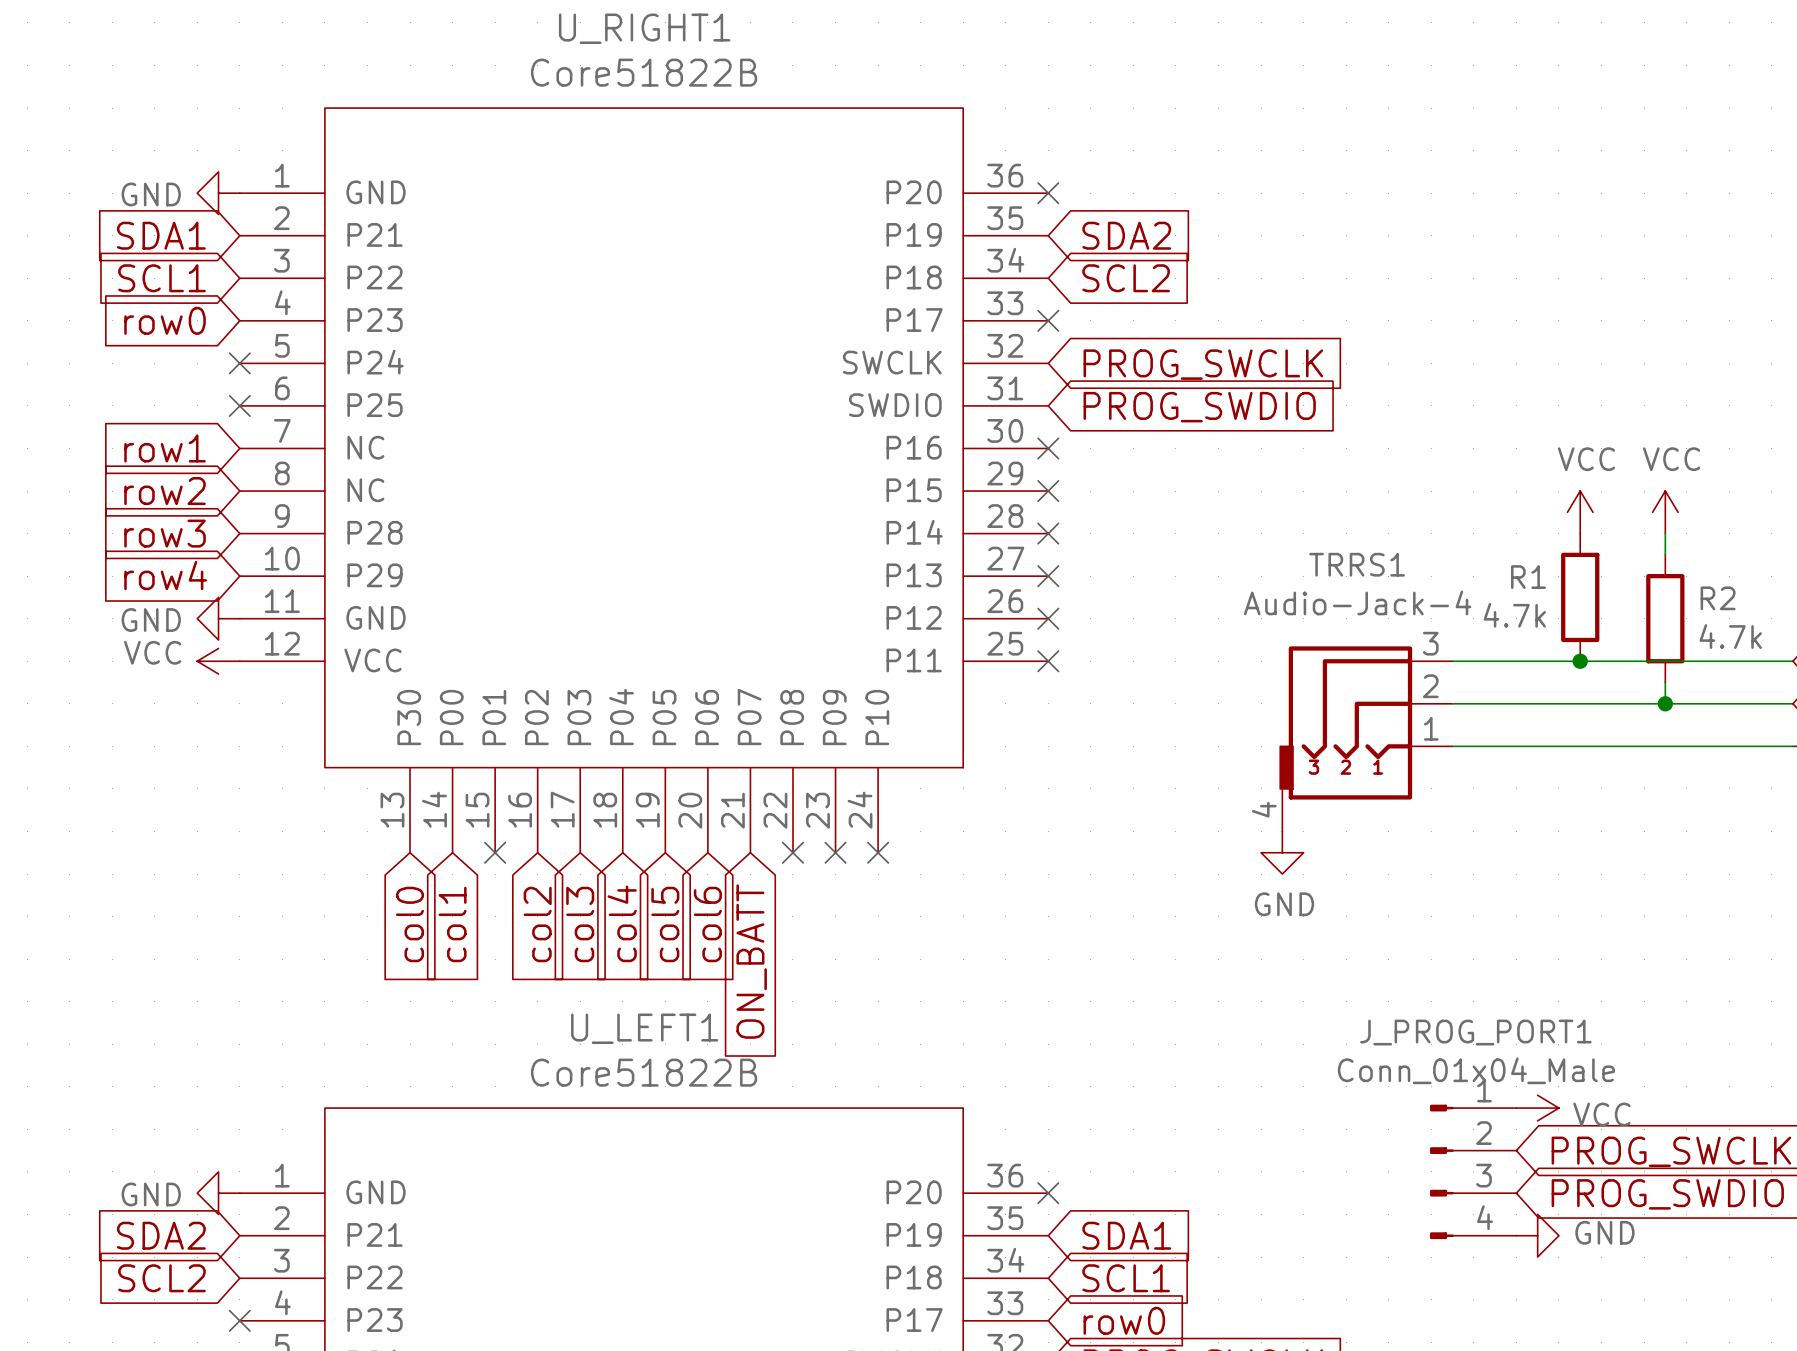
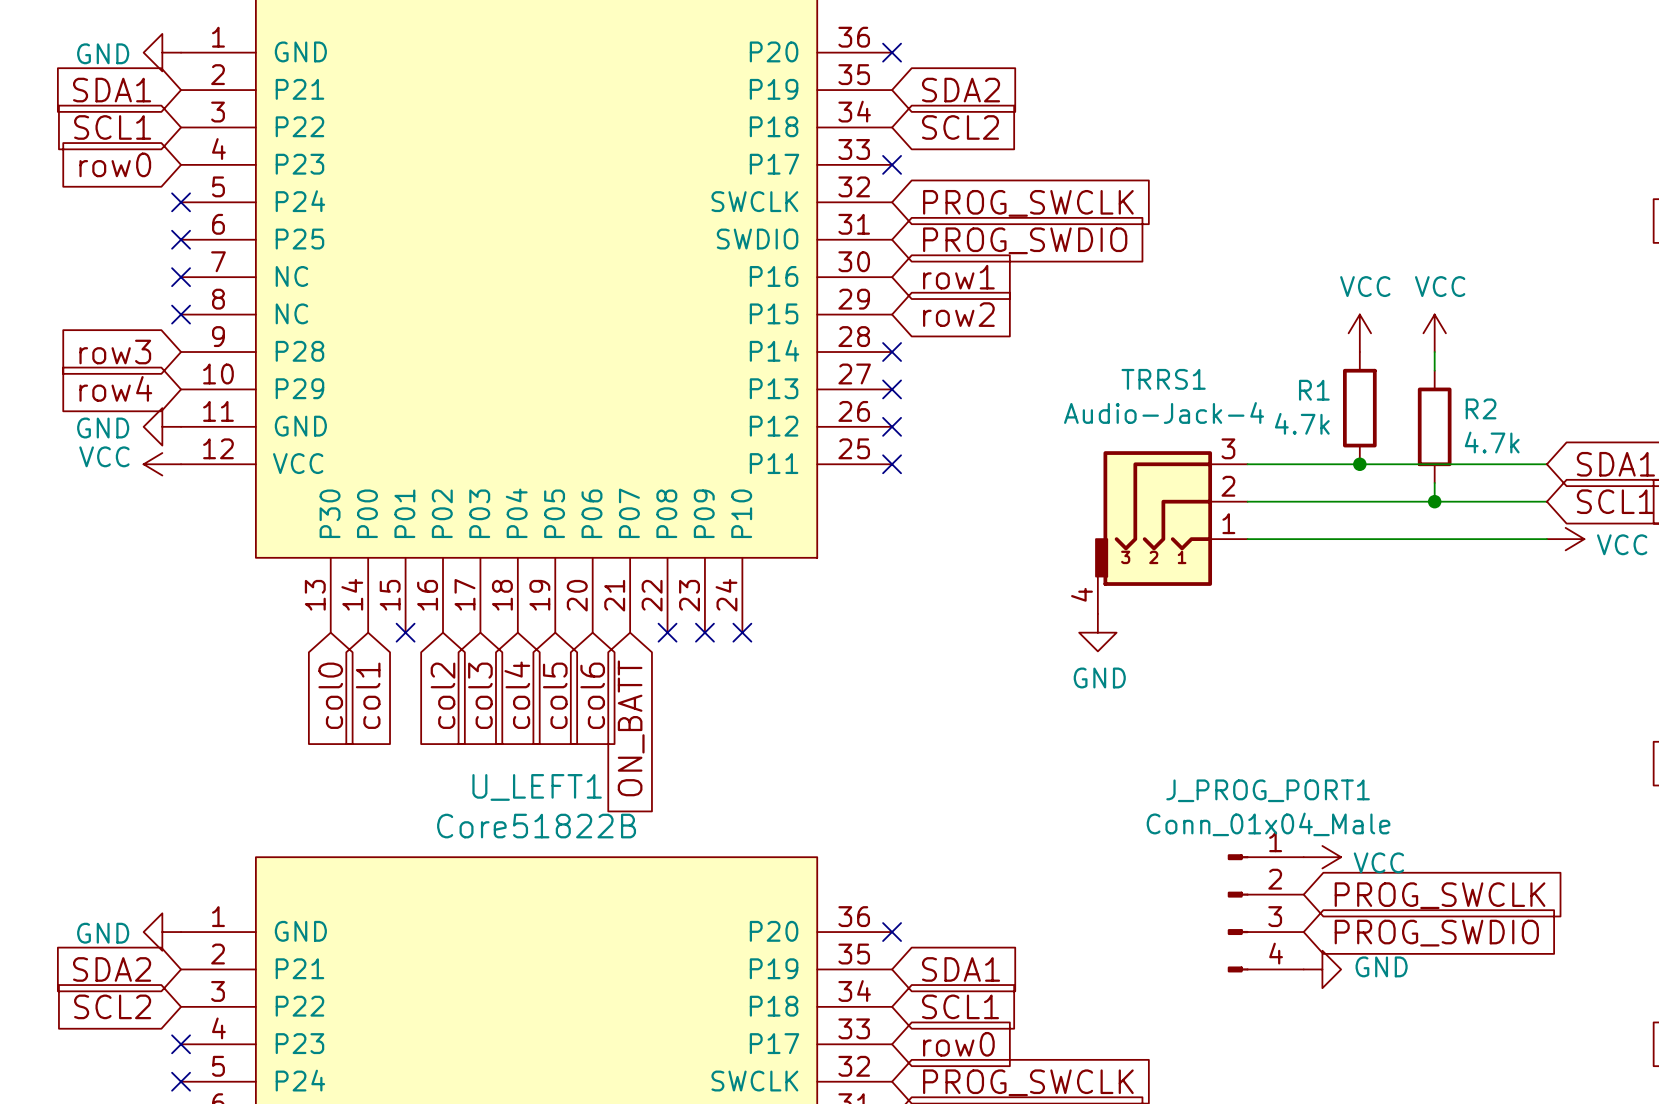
global label: row1 (165, 448) -> none
no-connect mark: none -> (181, 277)
no-connect mark: (1048, 448) -> none
global label: none -> row1 (958, 277)
global label: row2 (165, 491) -> none
no-connect mark: none -> (181, 314)
no-connect mark: (1048, 491) -> none
global label: none -> row2 (958, 314)

